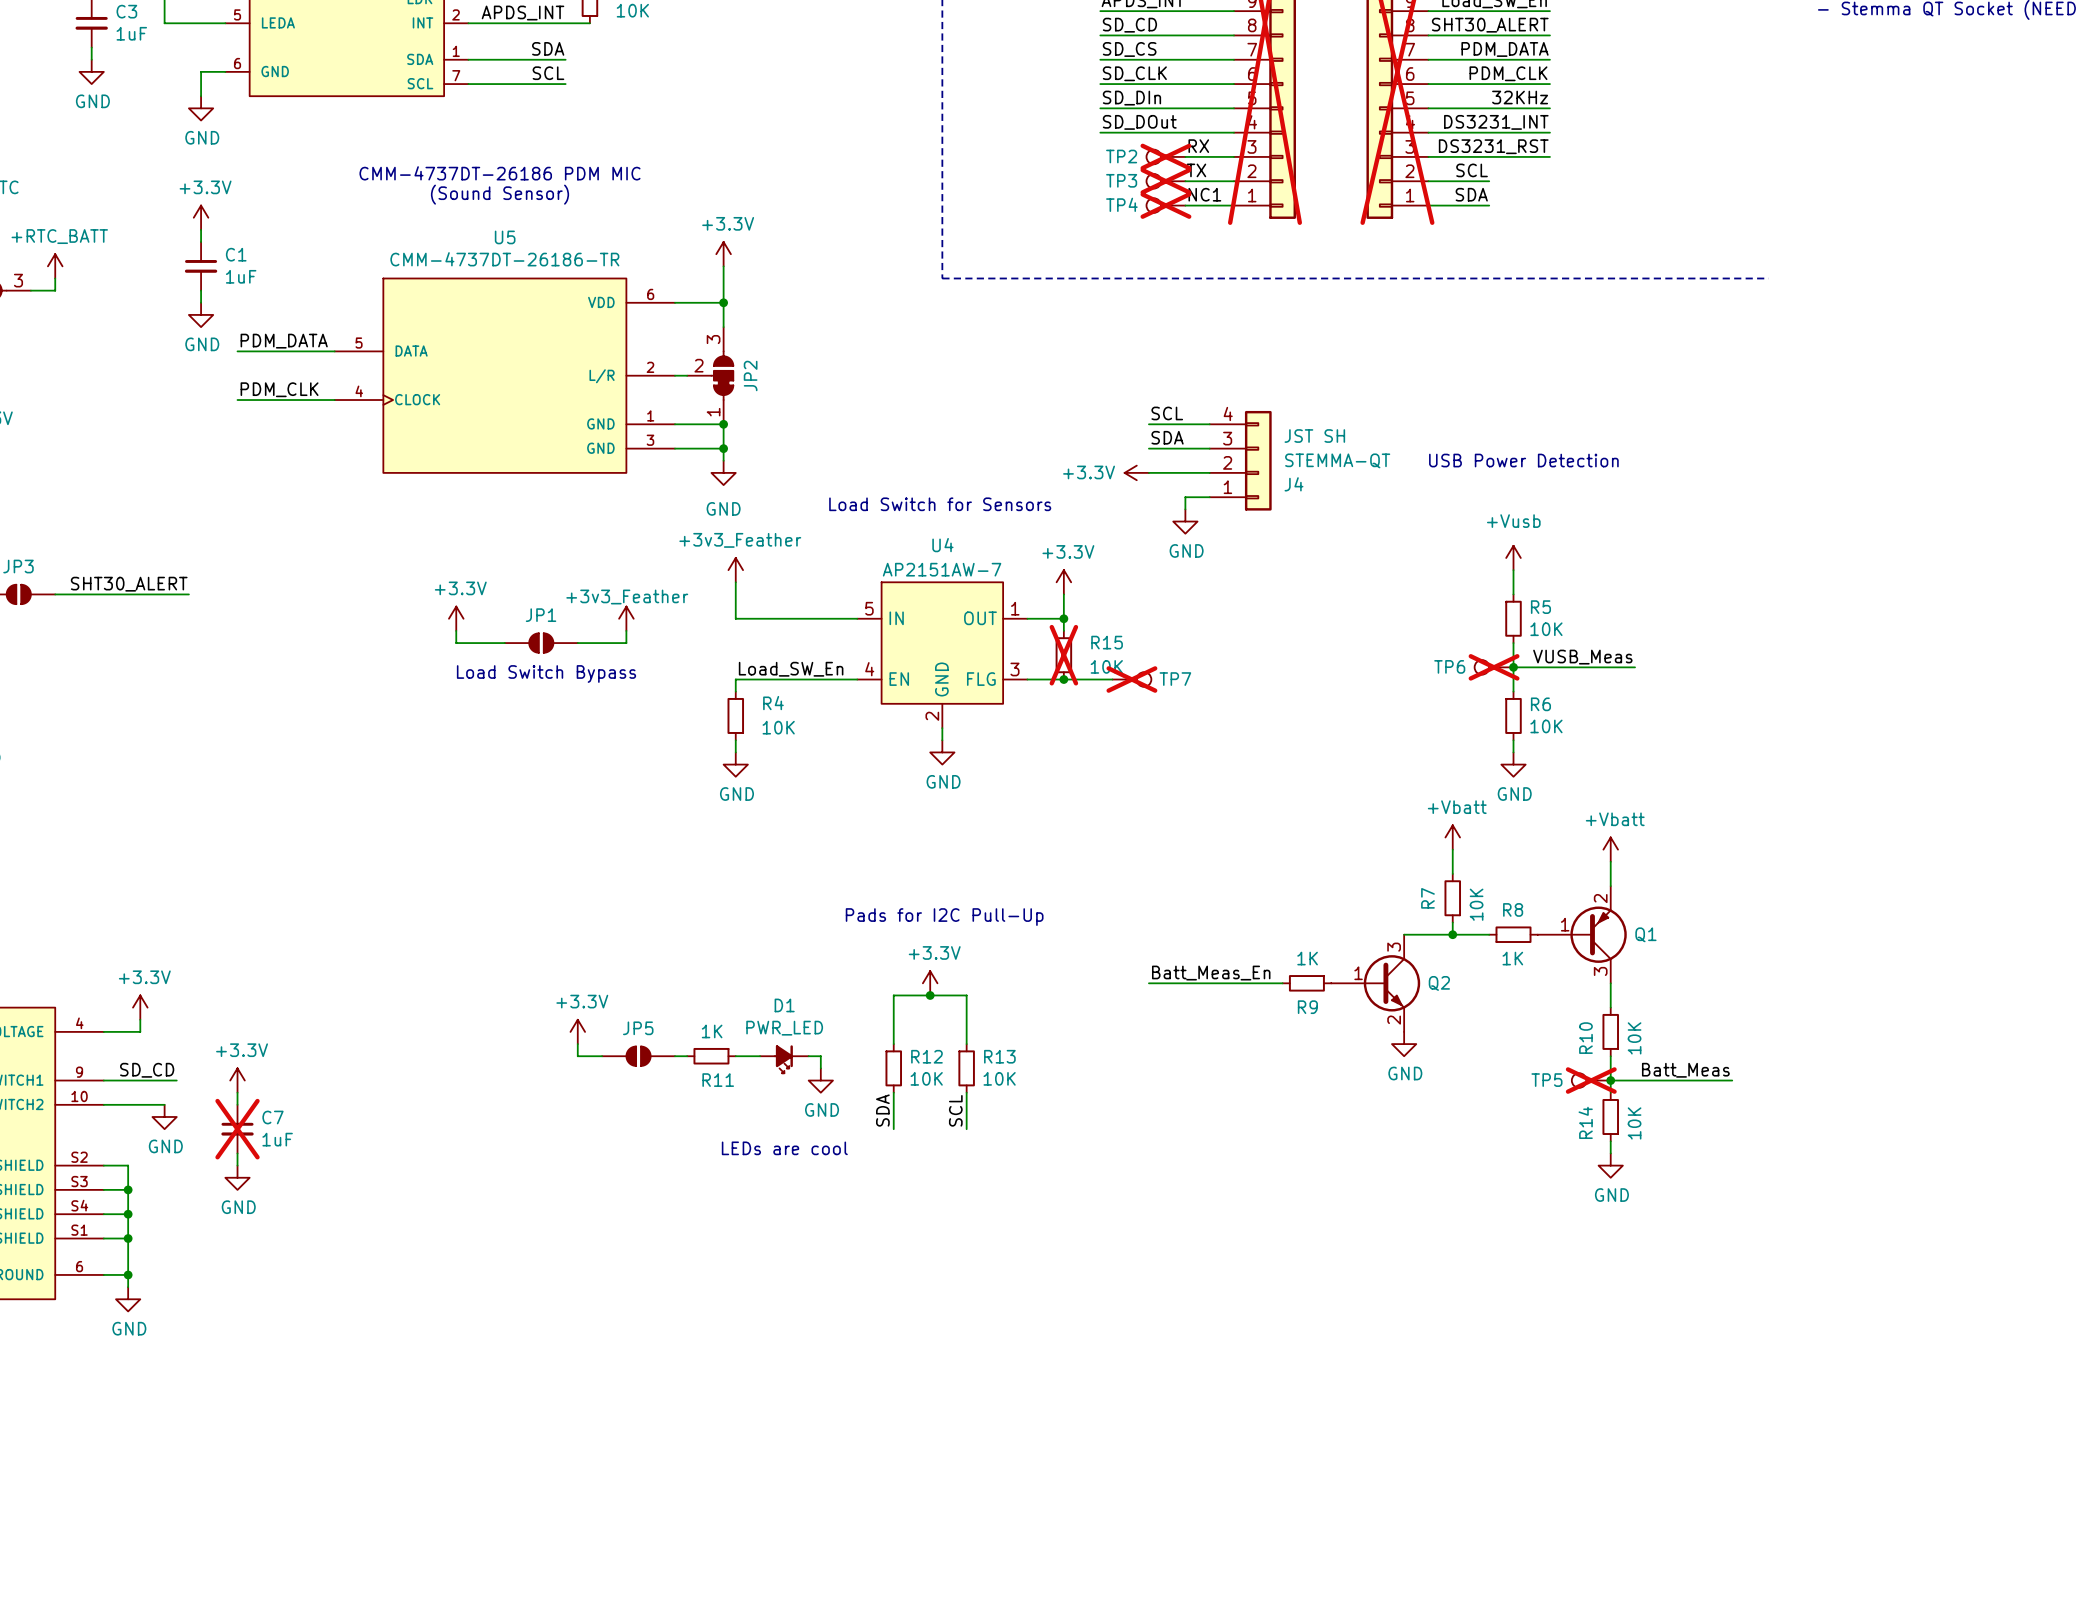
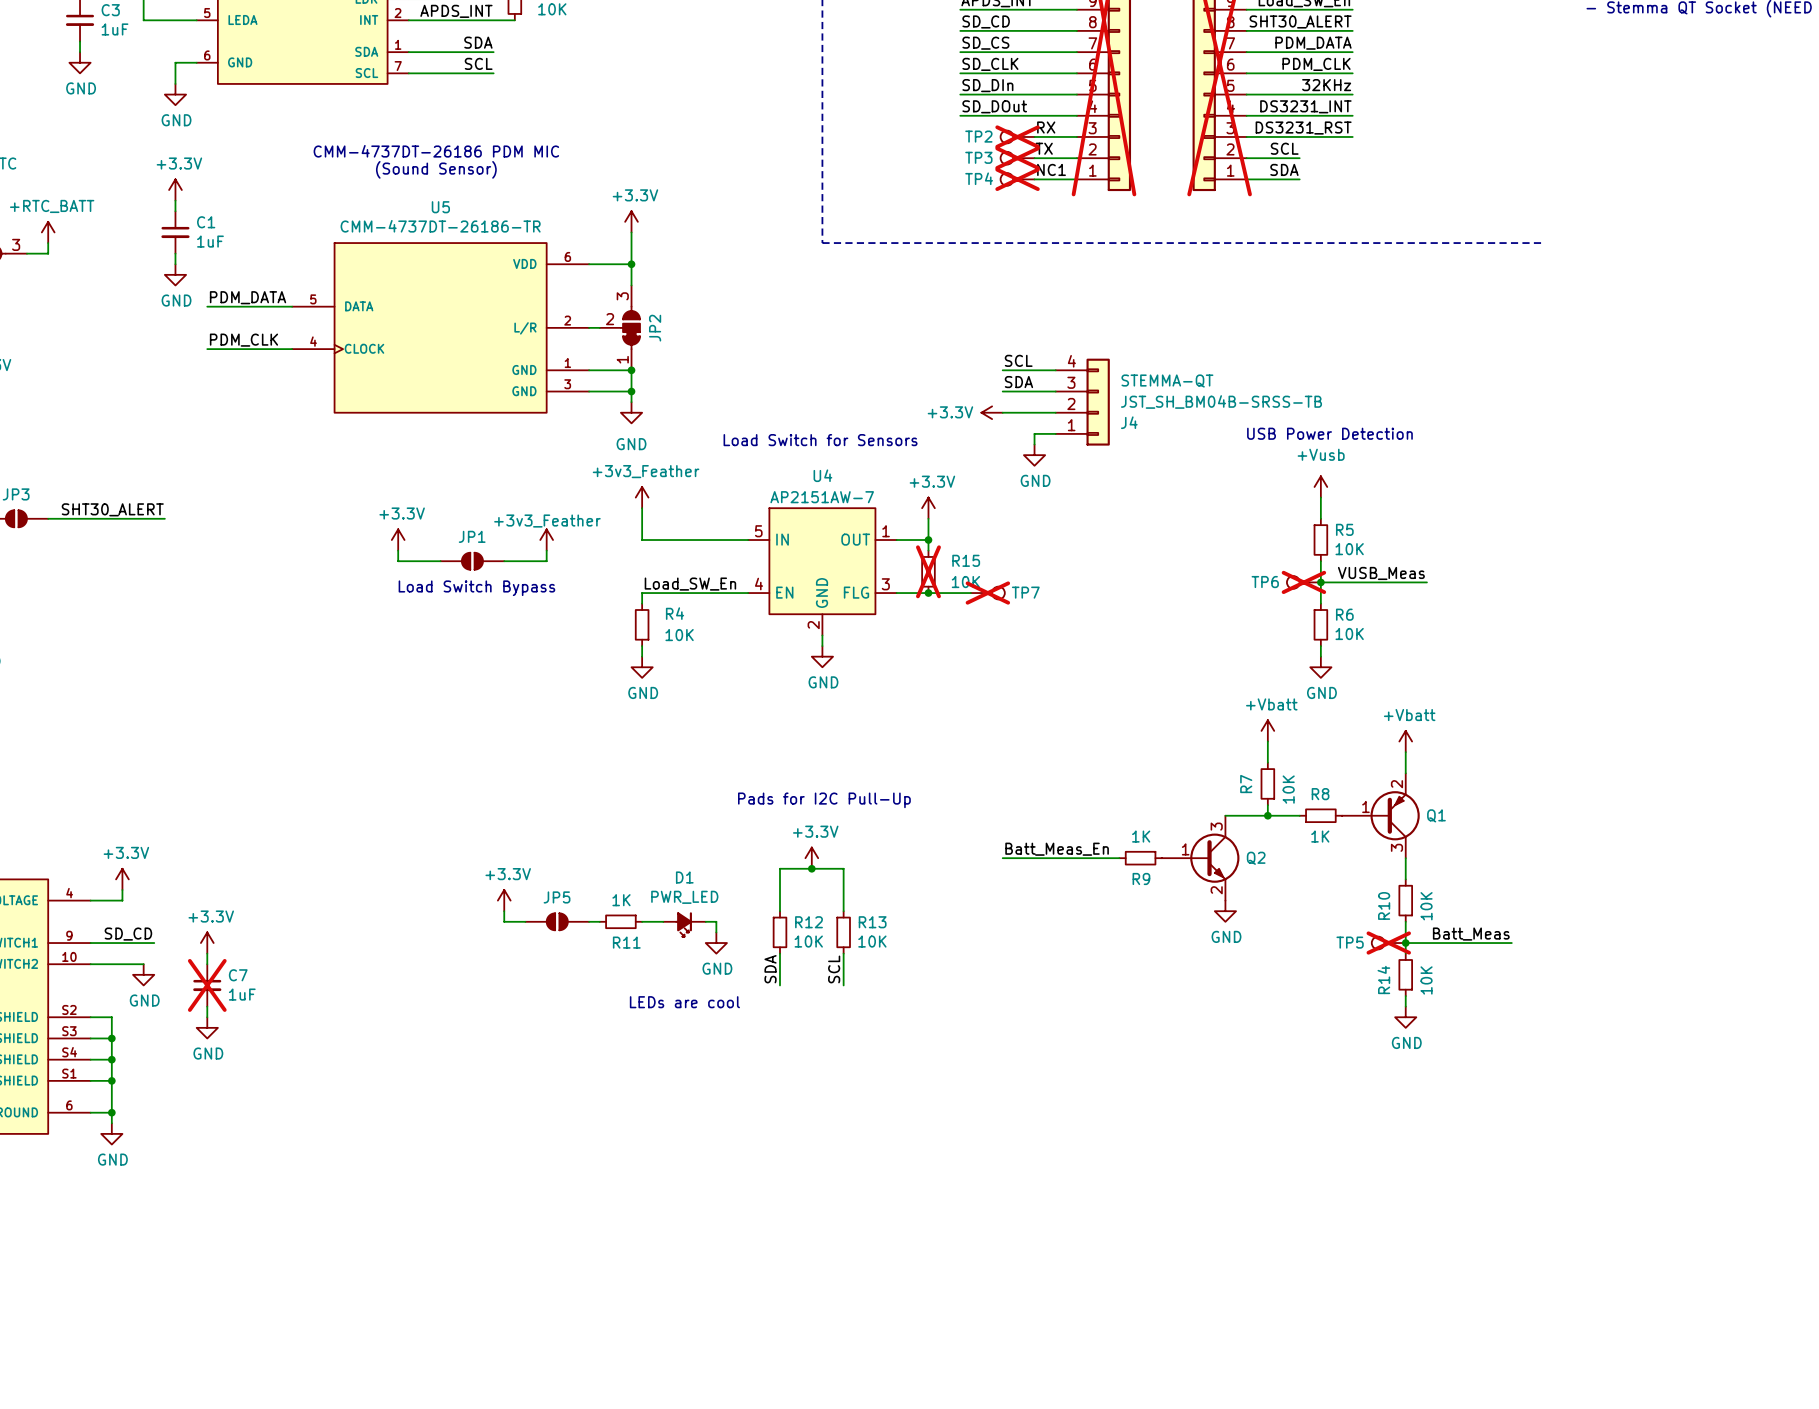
J4 text: JST SH (1314, 436) -> STEMMA-QT (1167, 381)
J4 value: STEMMA-QT (1337, 460) -> JST_SH_BM04B-SRSS-TB (1221, 401)
text position: USB Power Detection (1523, 460) -> USB Power Detection (1329, 433)

